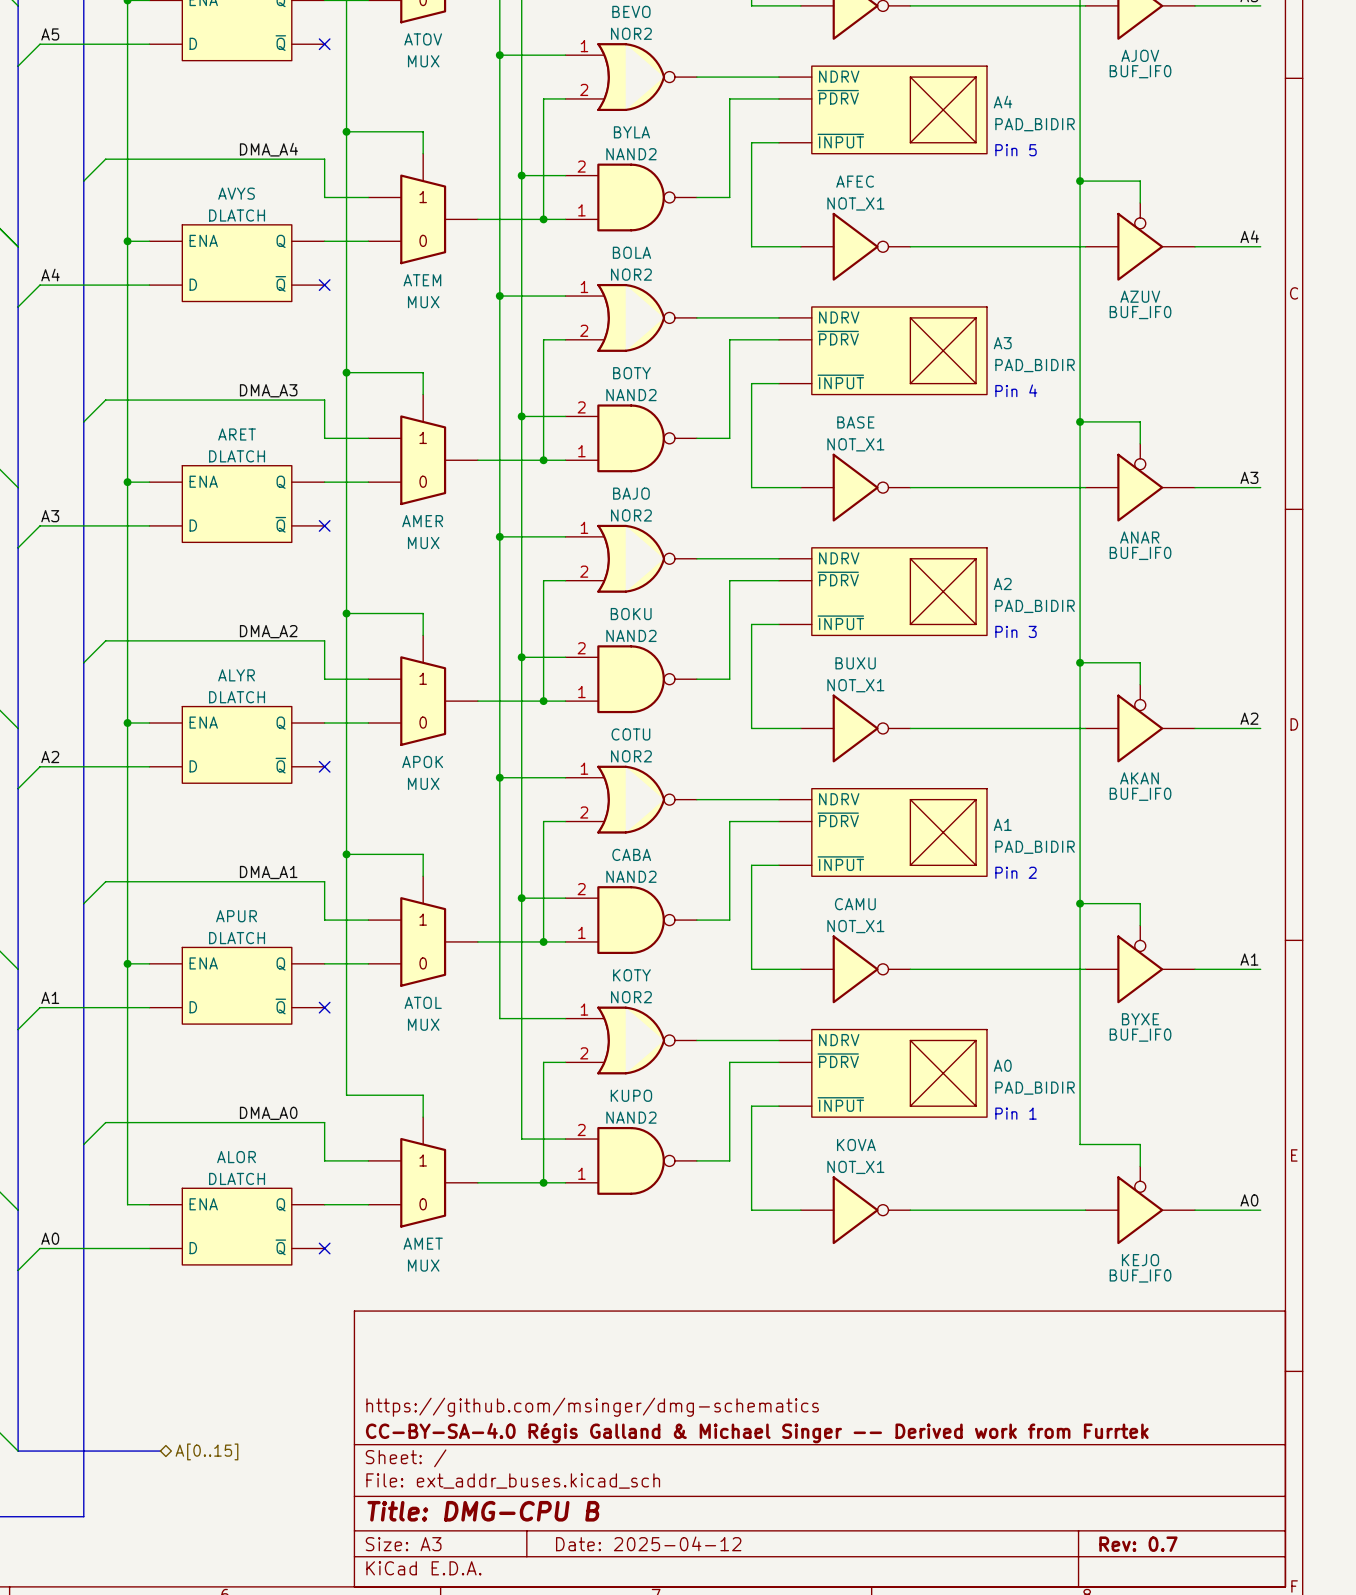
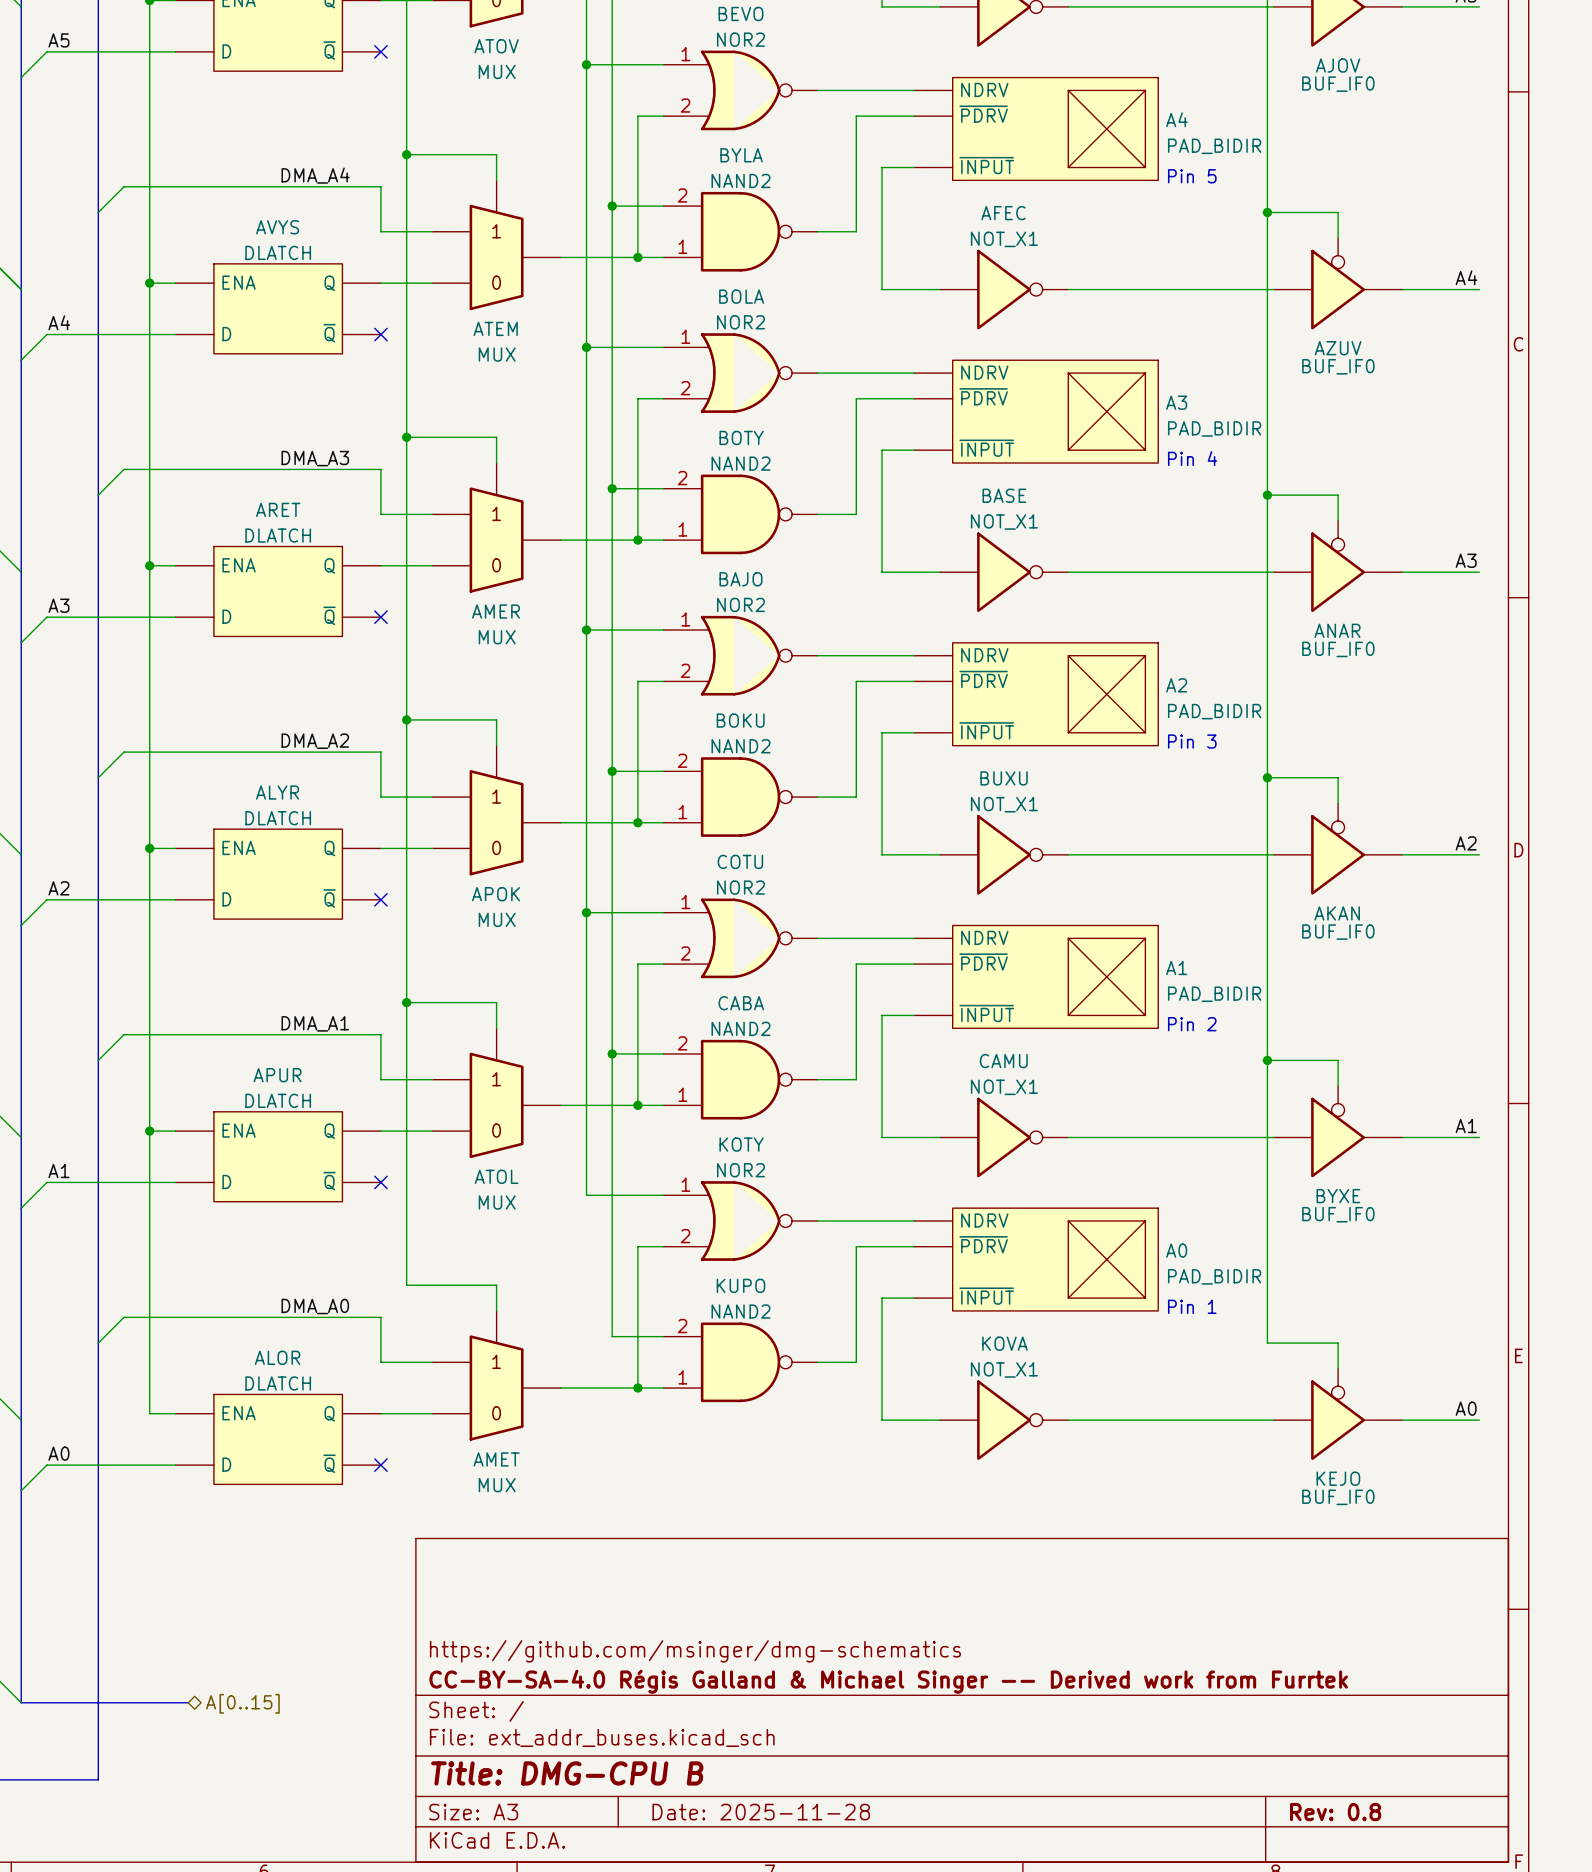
title block: Date: 2025-04-12 (648, 1543) -> Date: 2025-11-28 (761, 1812)
title block: Rev: 0.7 (1138, 1544) -> Rev: 0.8 (1335, 1812)

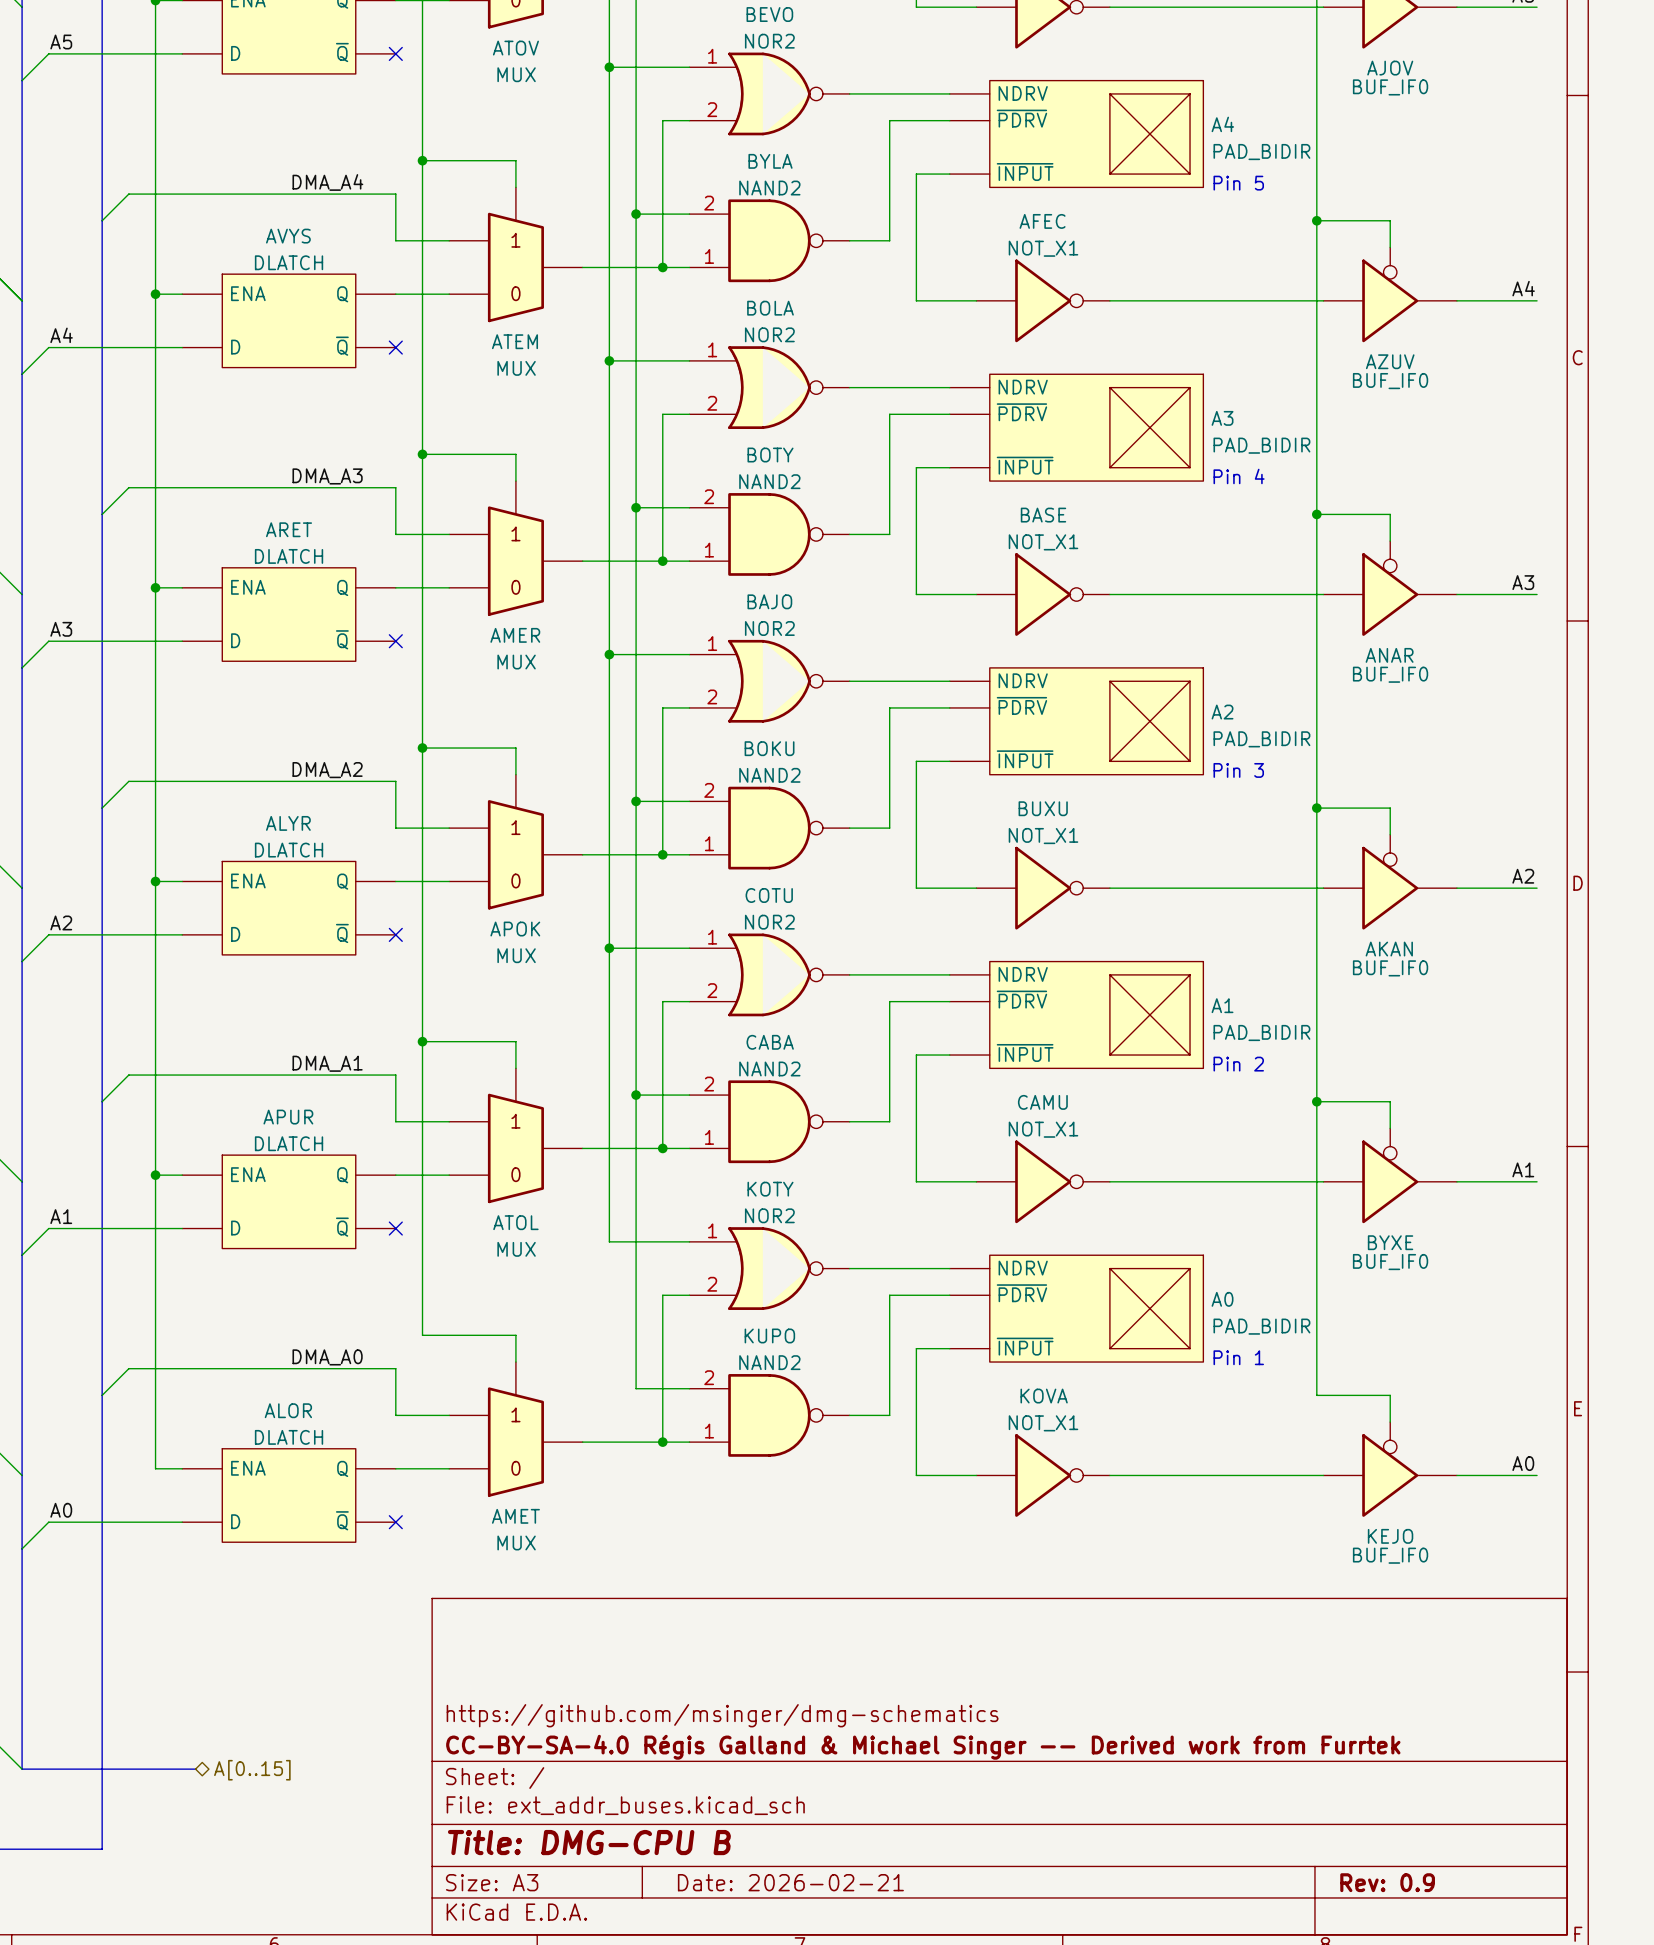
title block: Date: 2025-11-28 (761, 1812) -> Date: 2026-02-21 (790, 1882)
title block: Rev: 0.8 (1335, 1812) -> Rev: 0.9 (1387, 1882)

